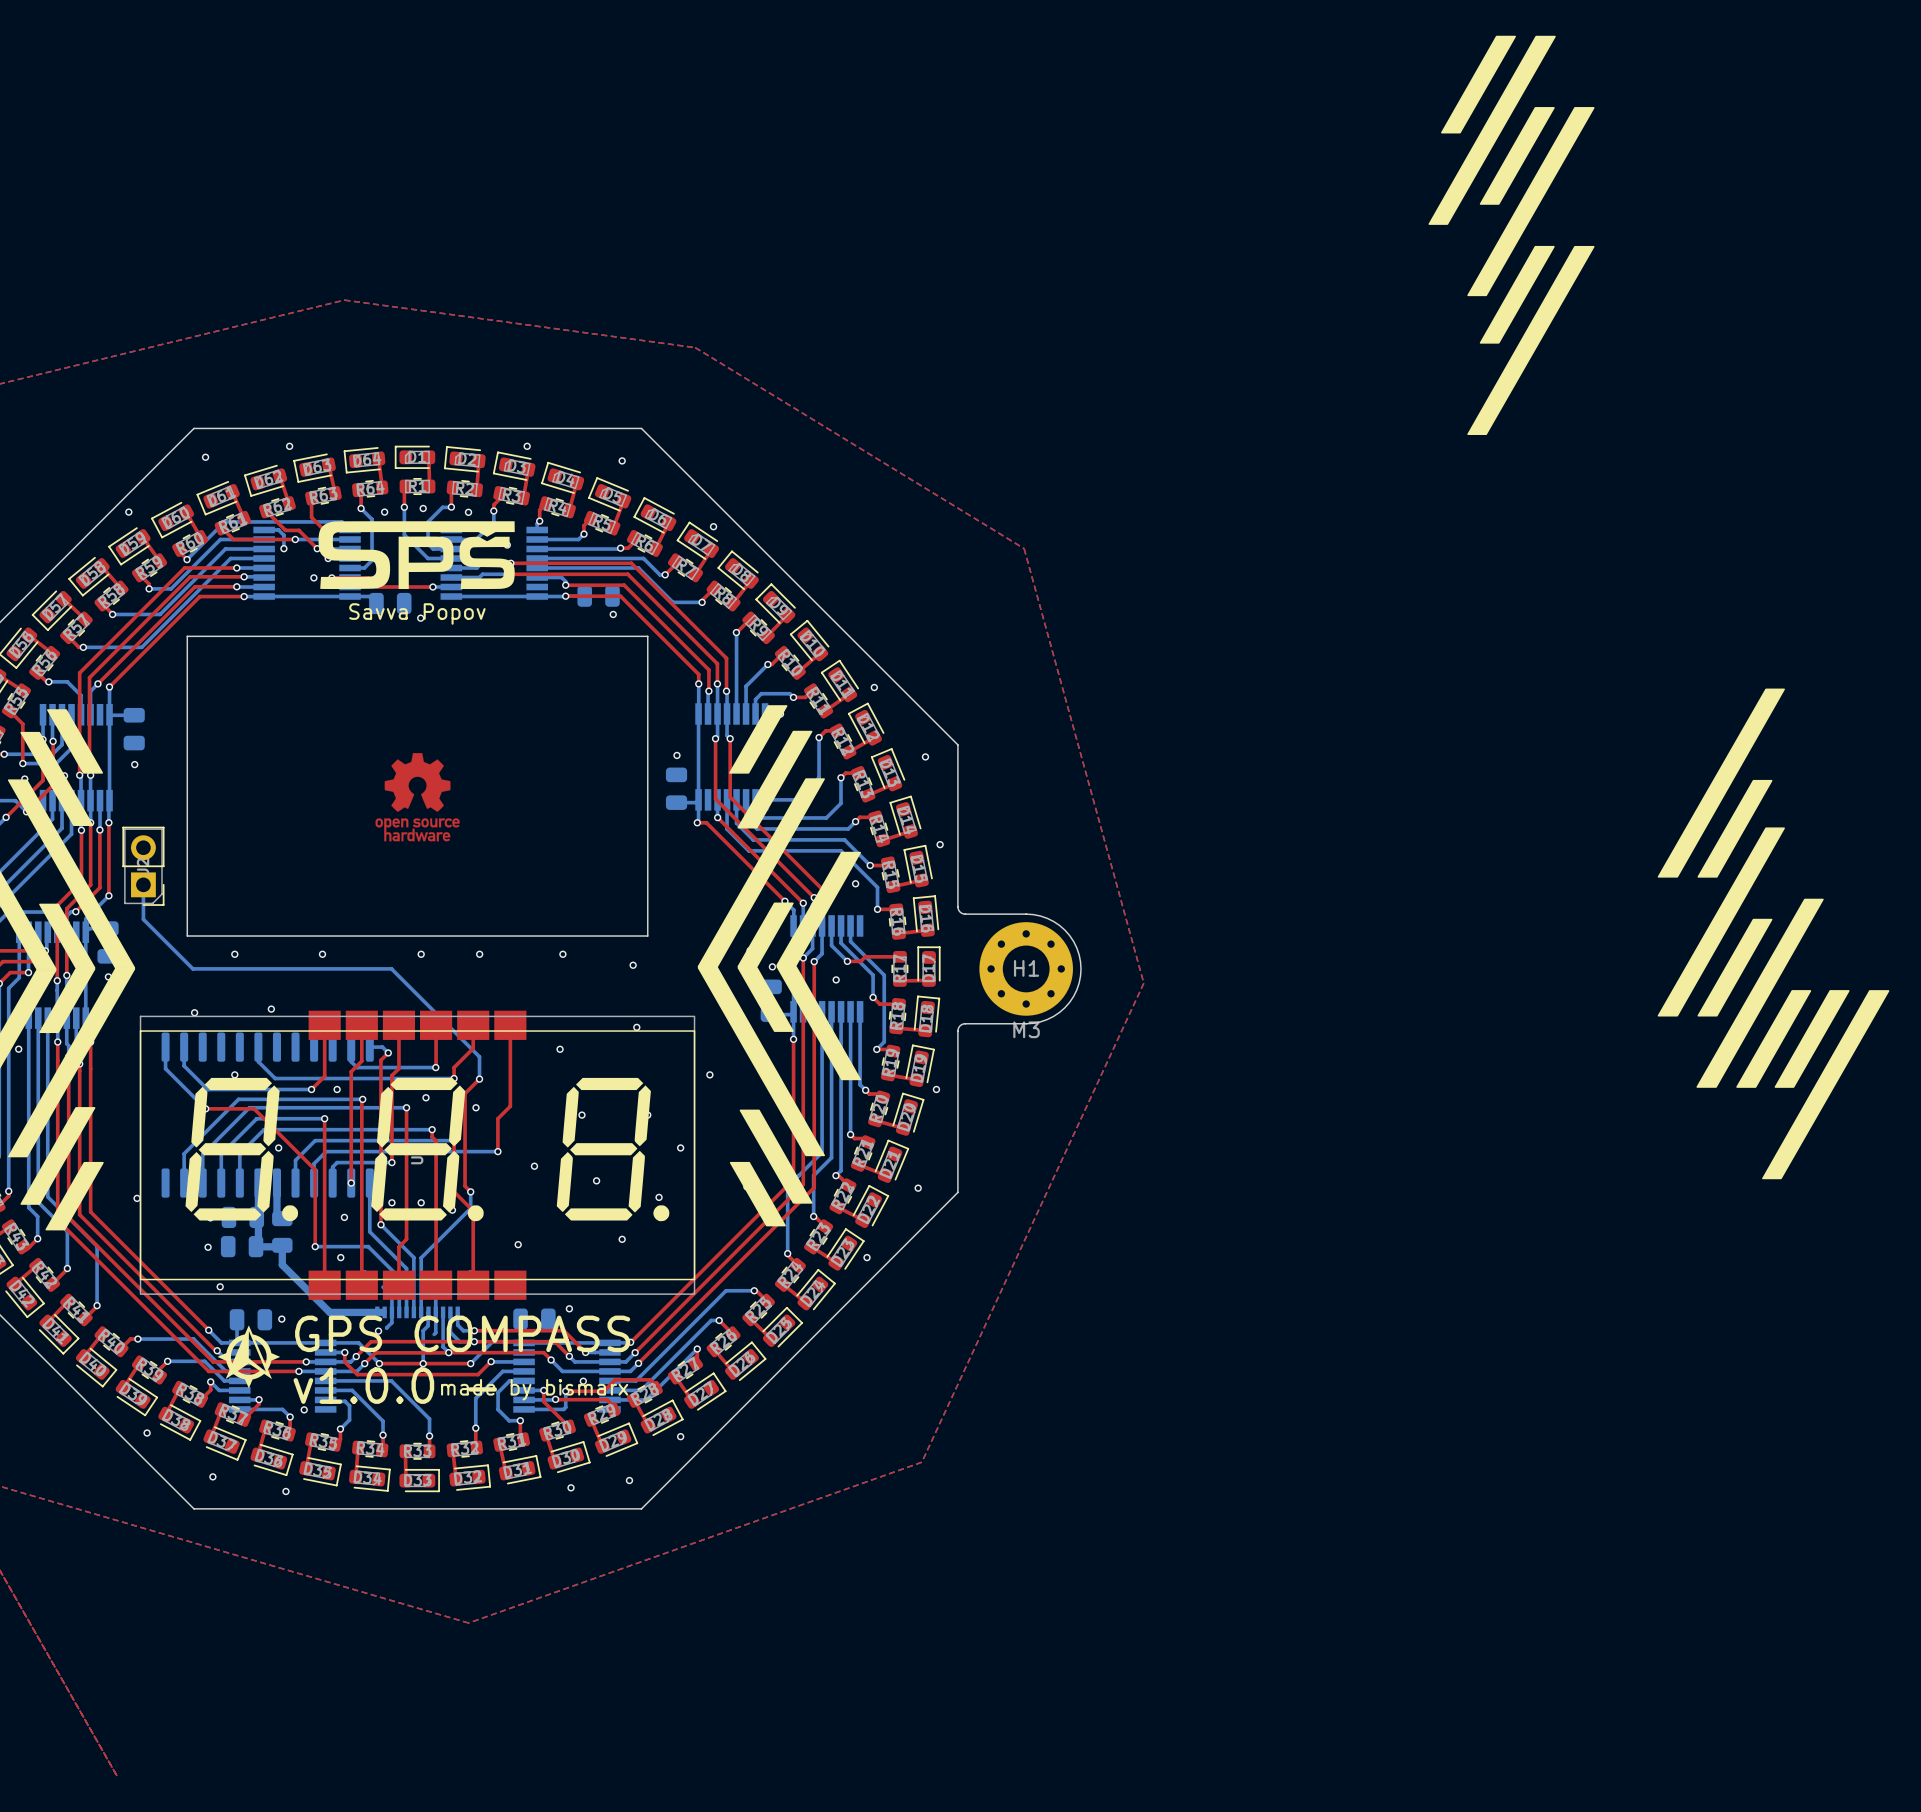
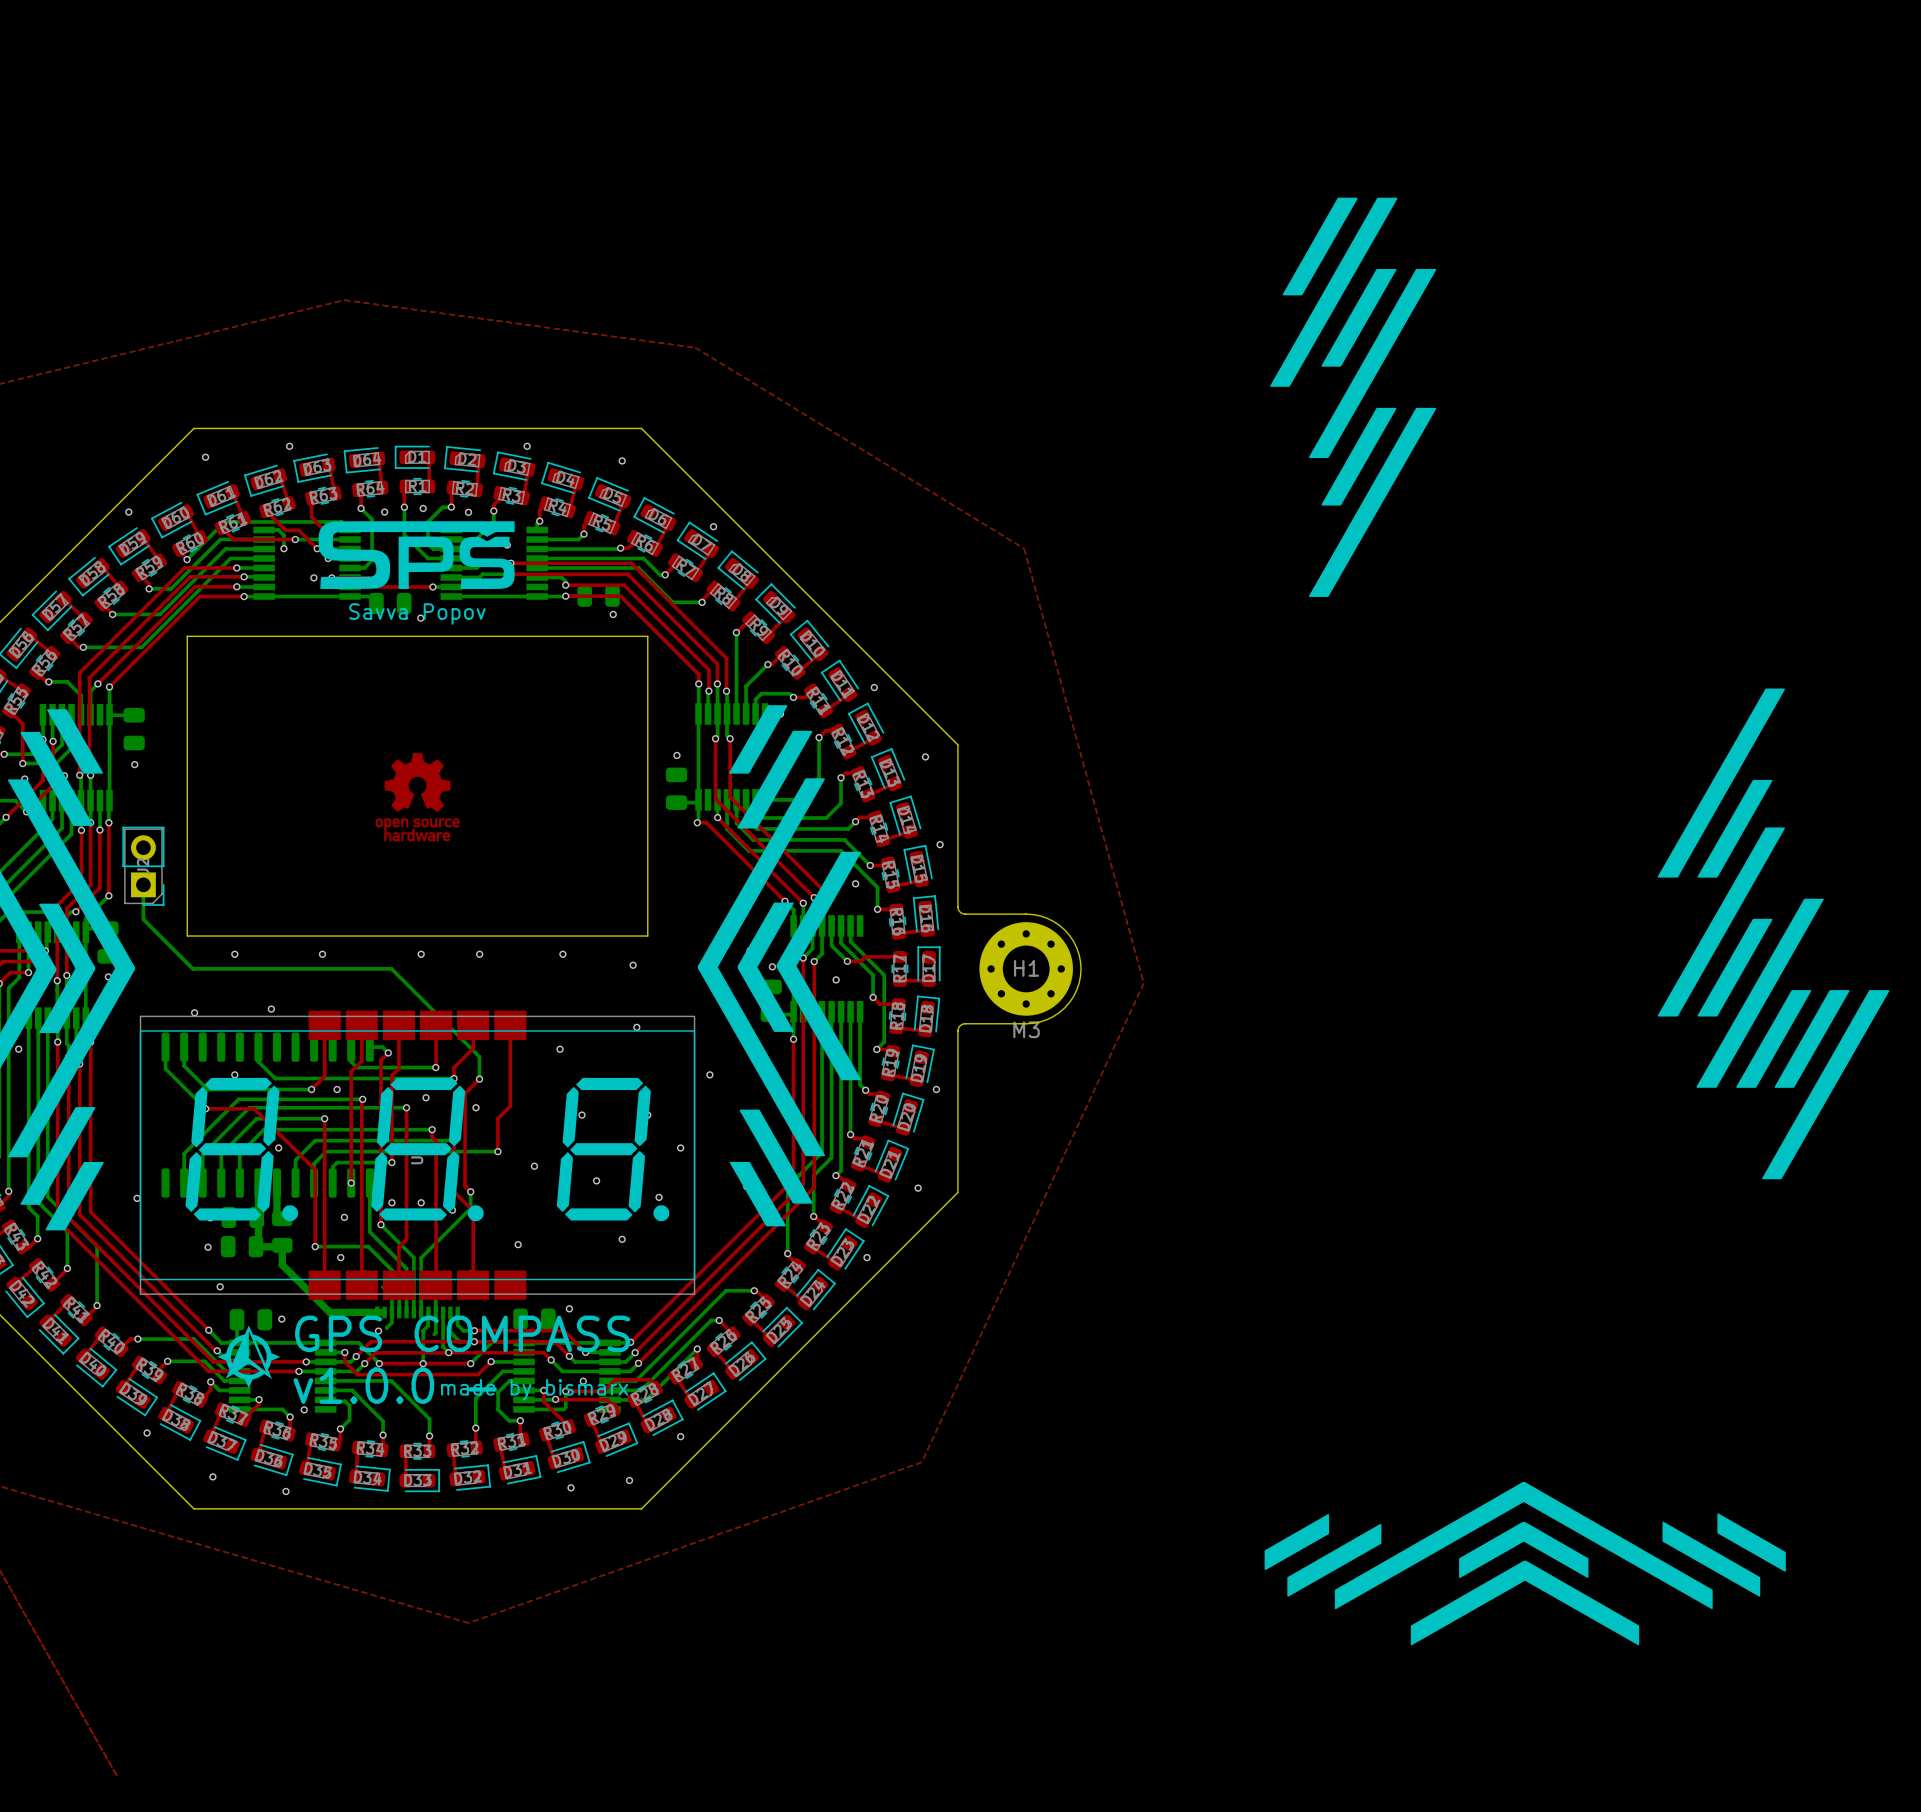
drawing: [1428, 35, 1595, 436] -> none
drawing: none -> [1270, 197, 1437, 597]
drawing: none -> [1264, 1481, 1786, 1646]

